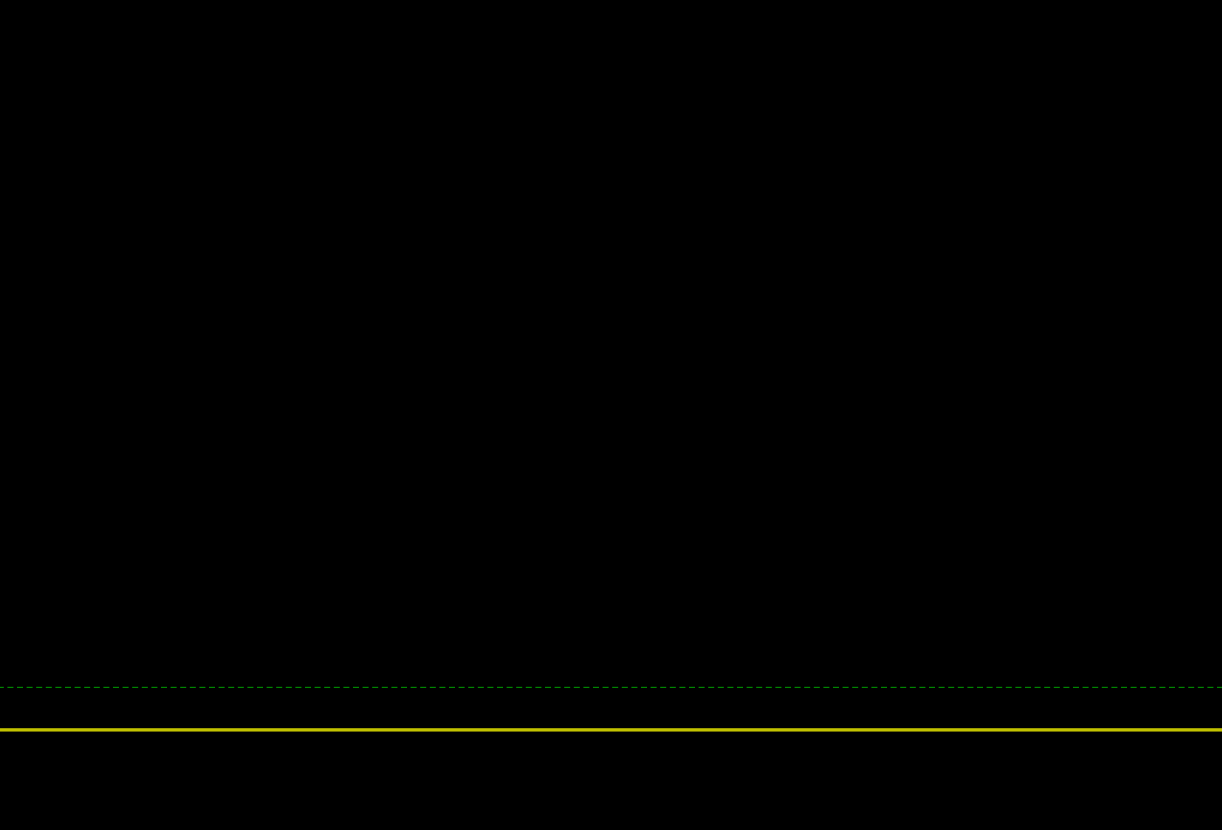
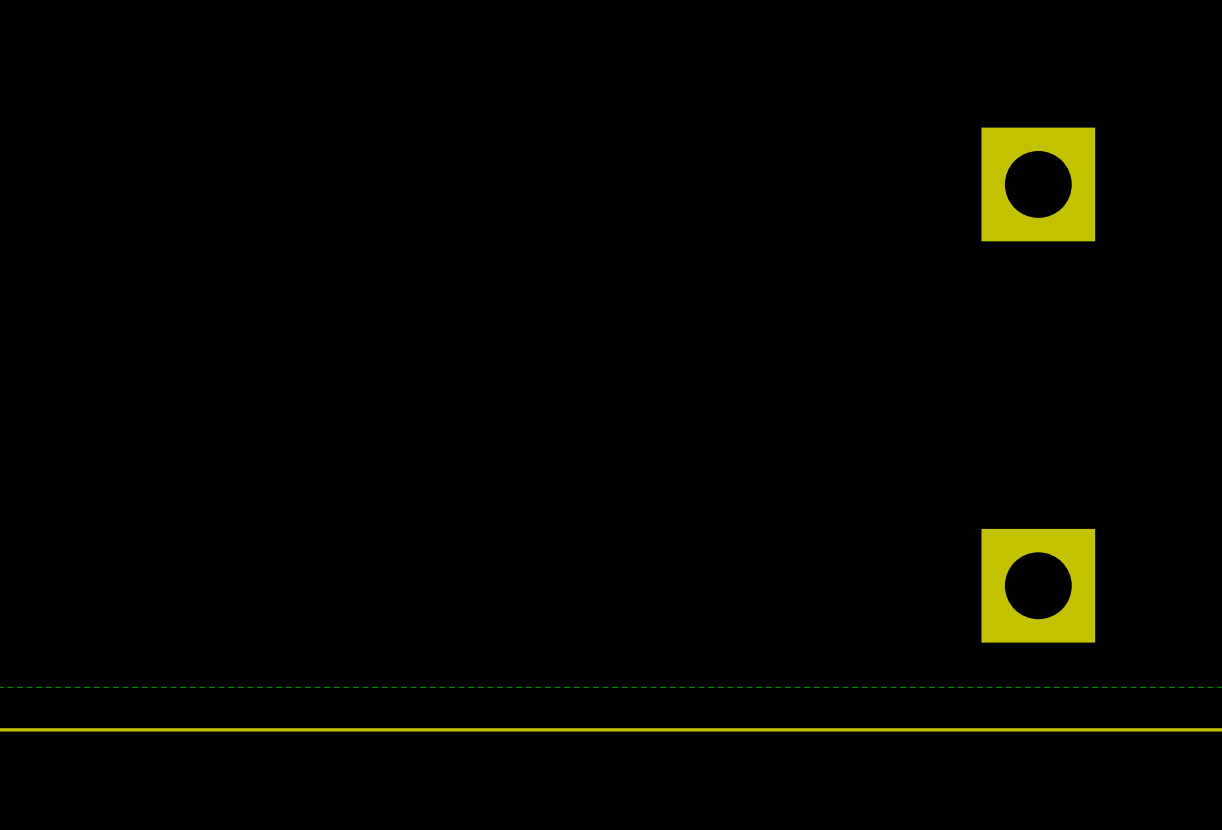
part: none -> (1038, 184)
part: none -> (1038, 585)

